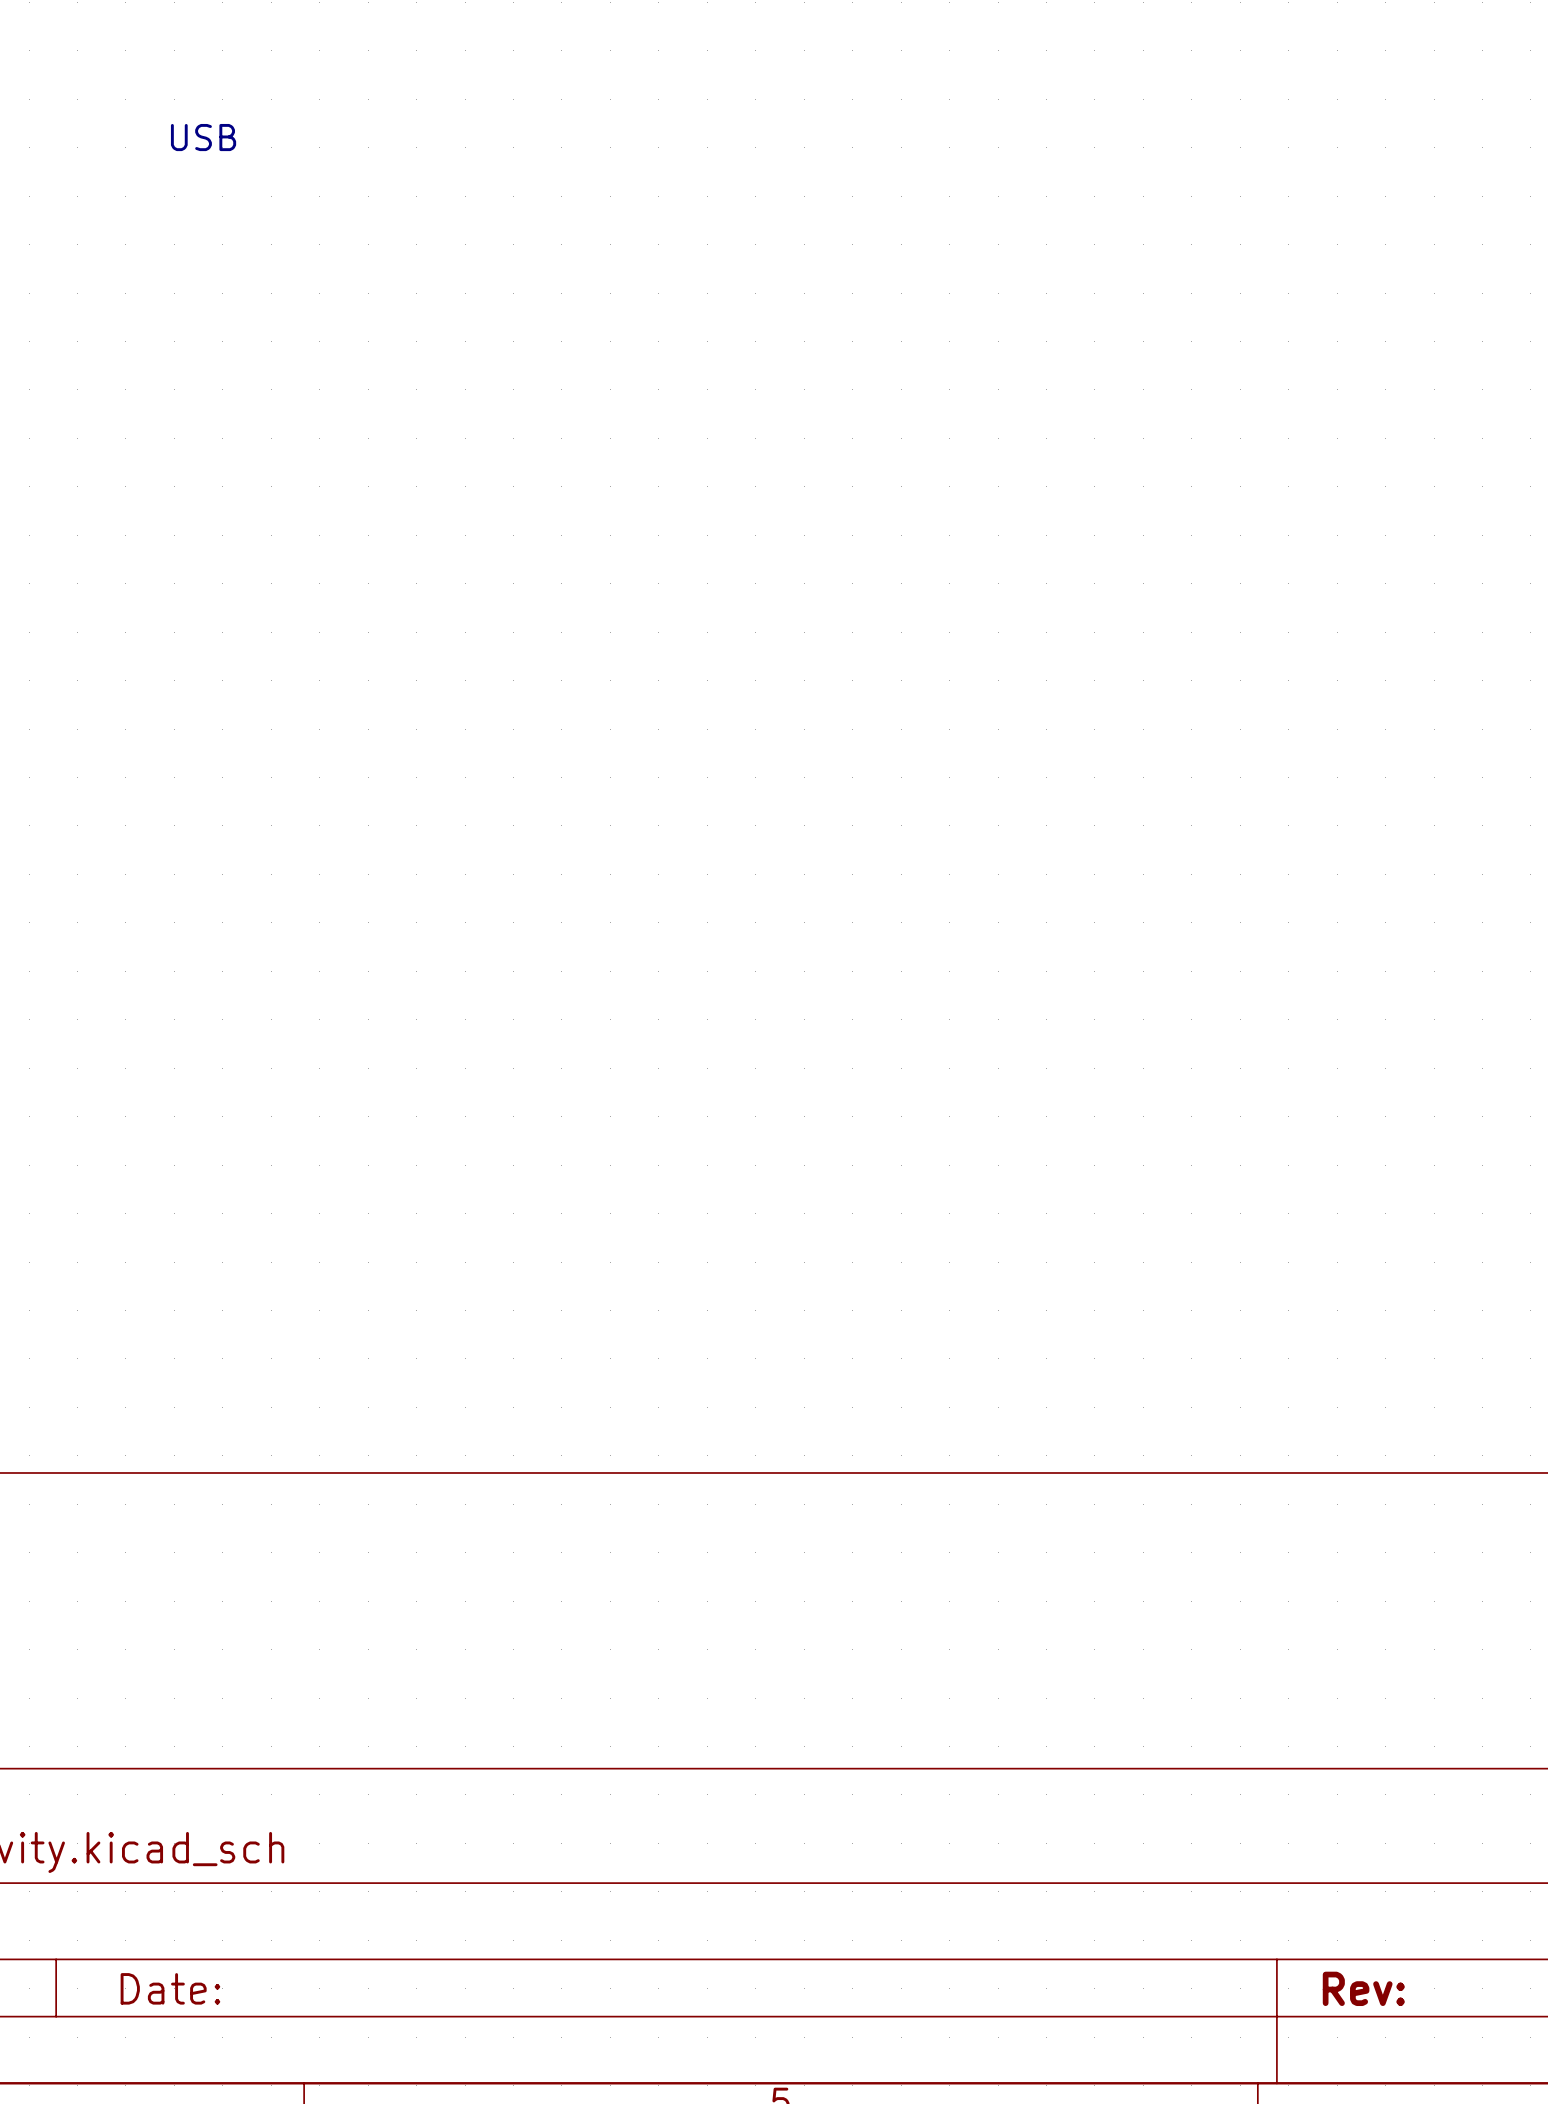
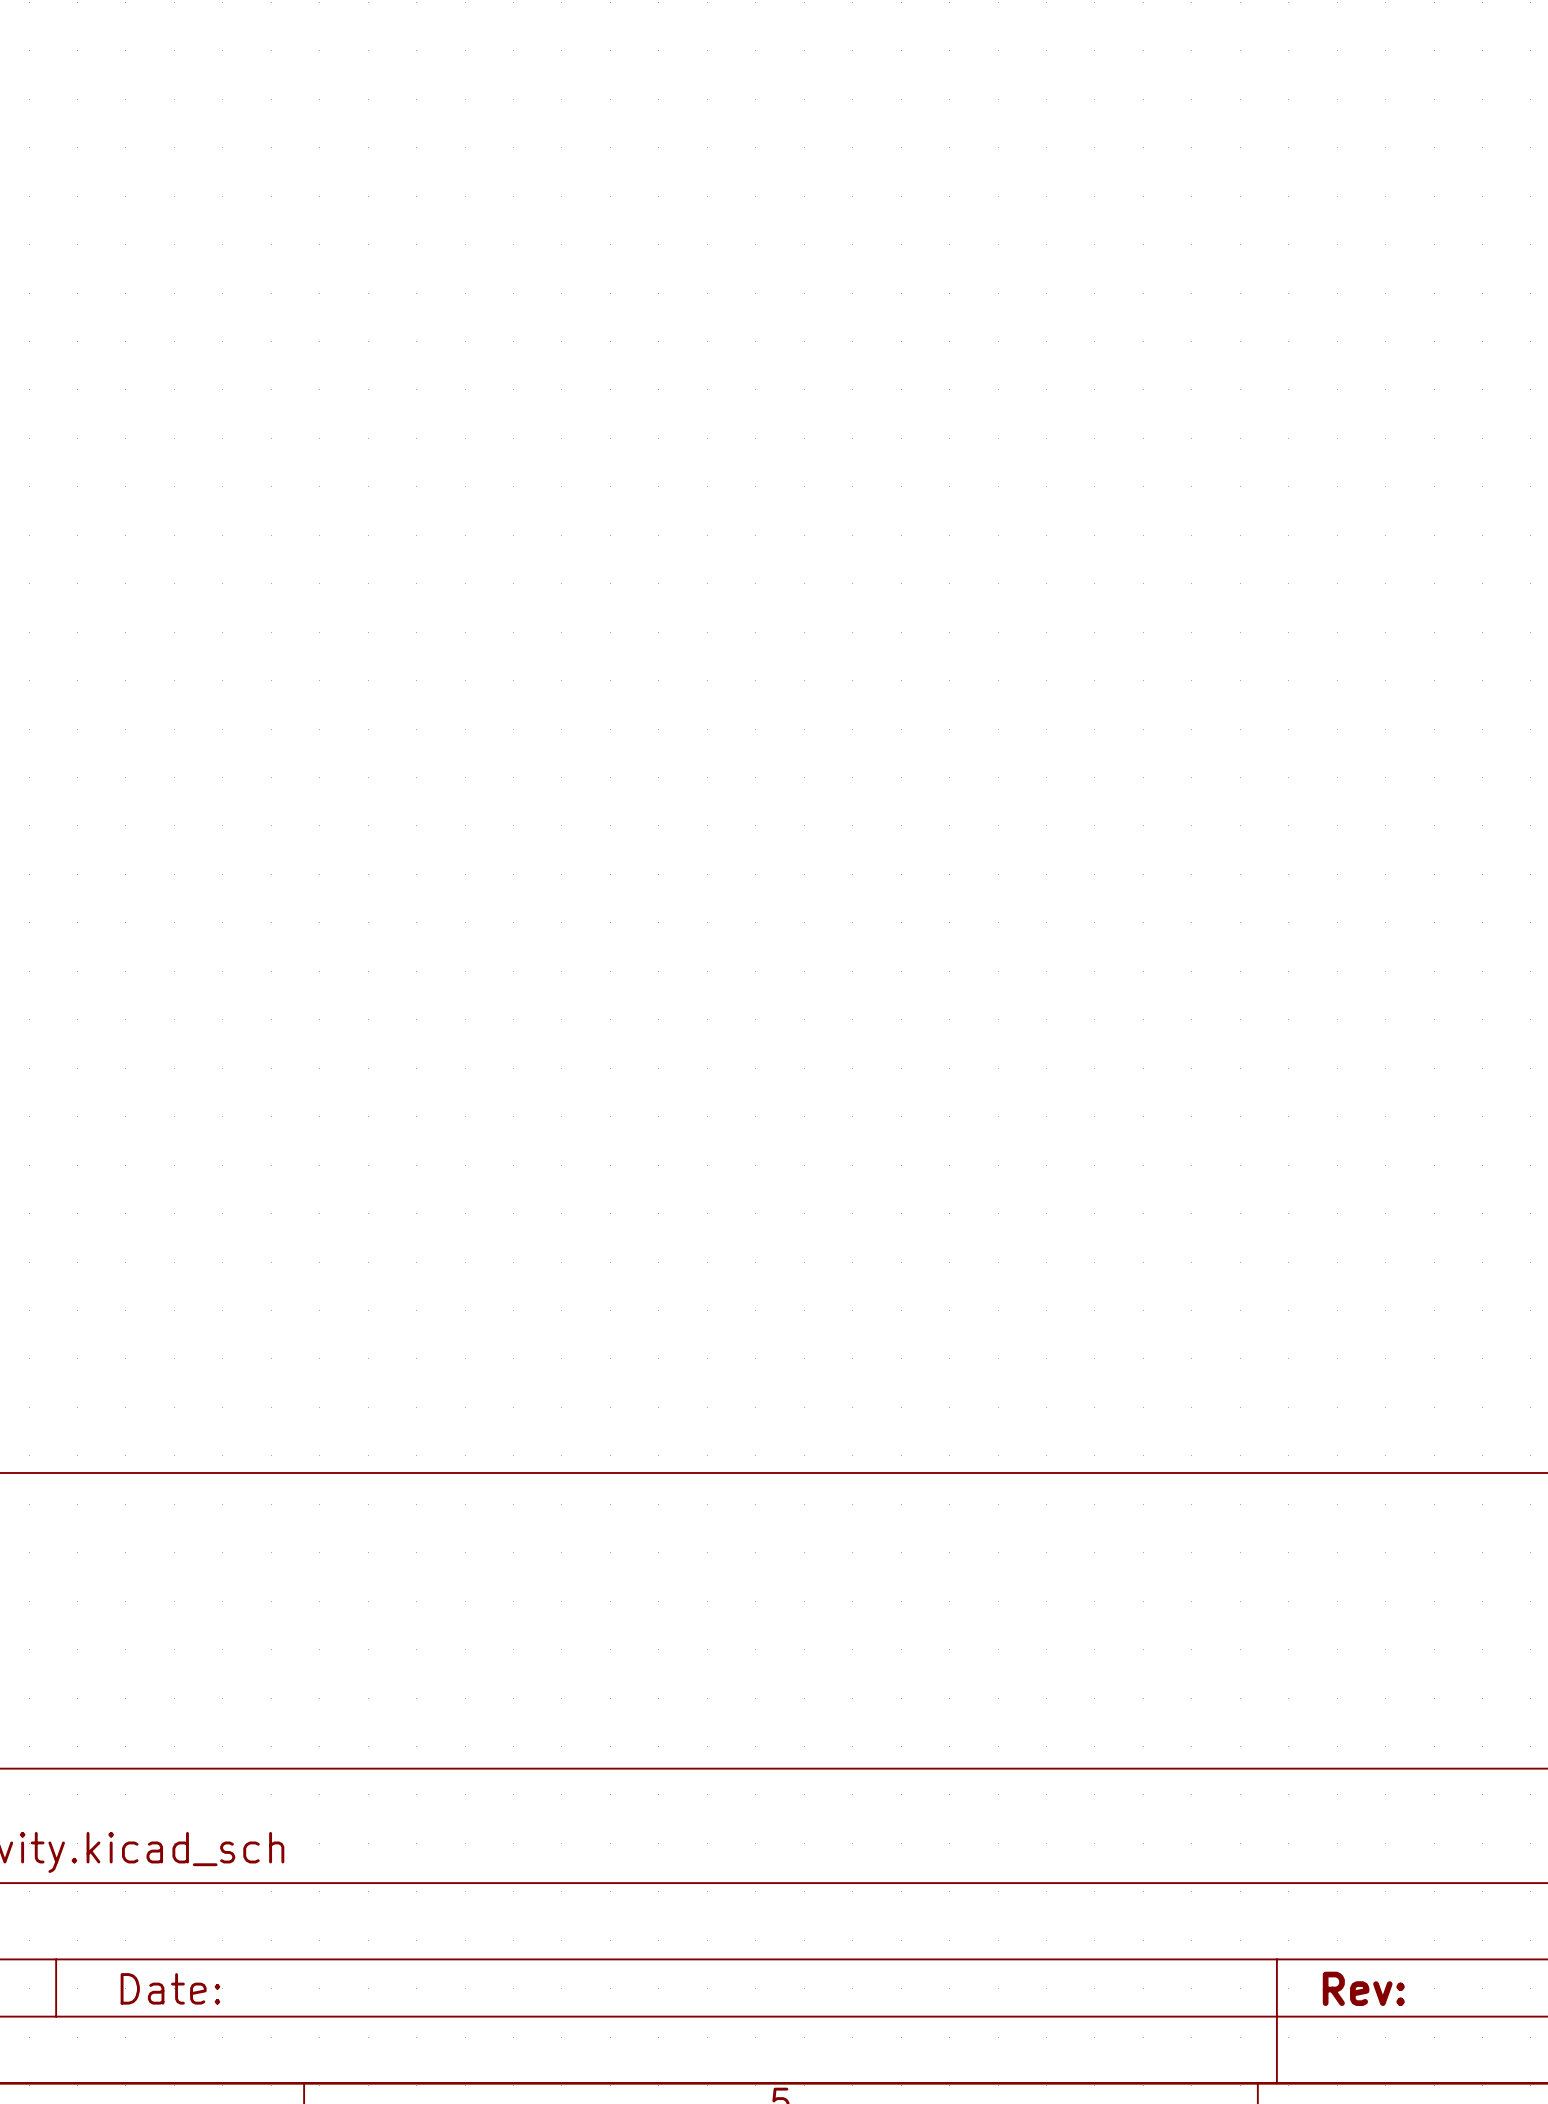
text: USB (203, 137) -> none

